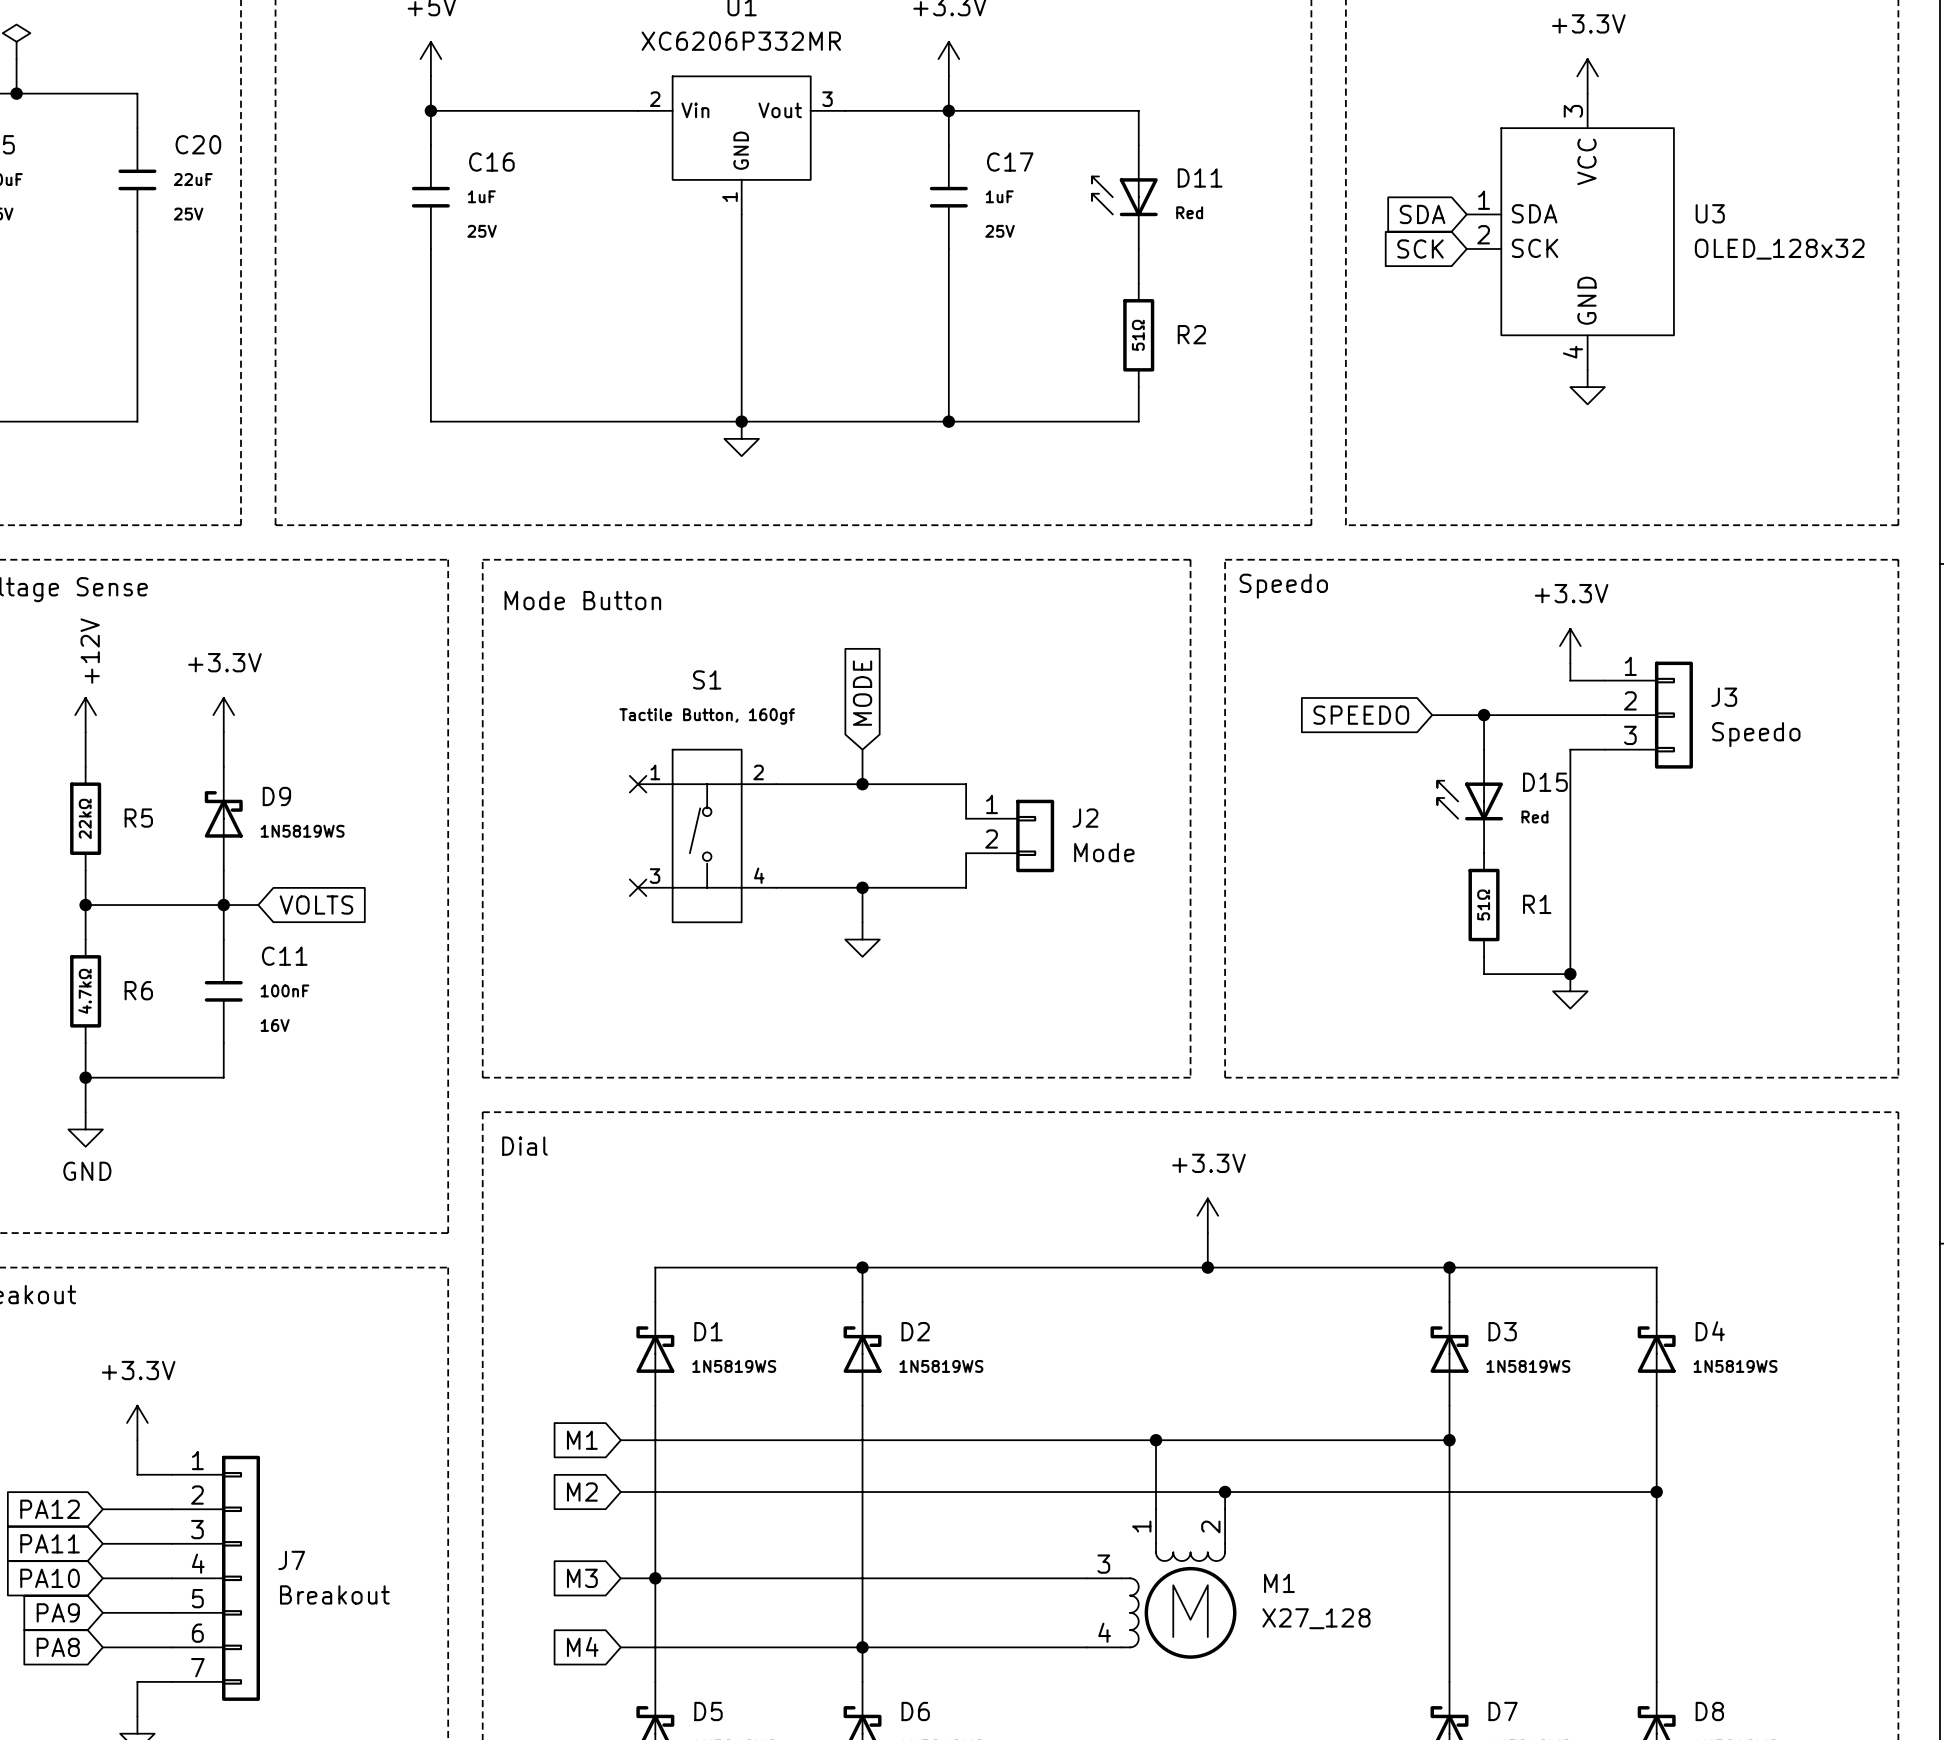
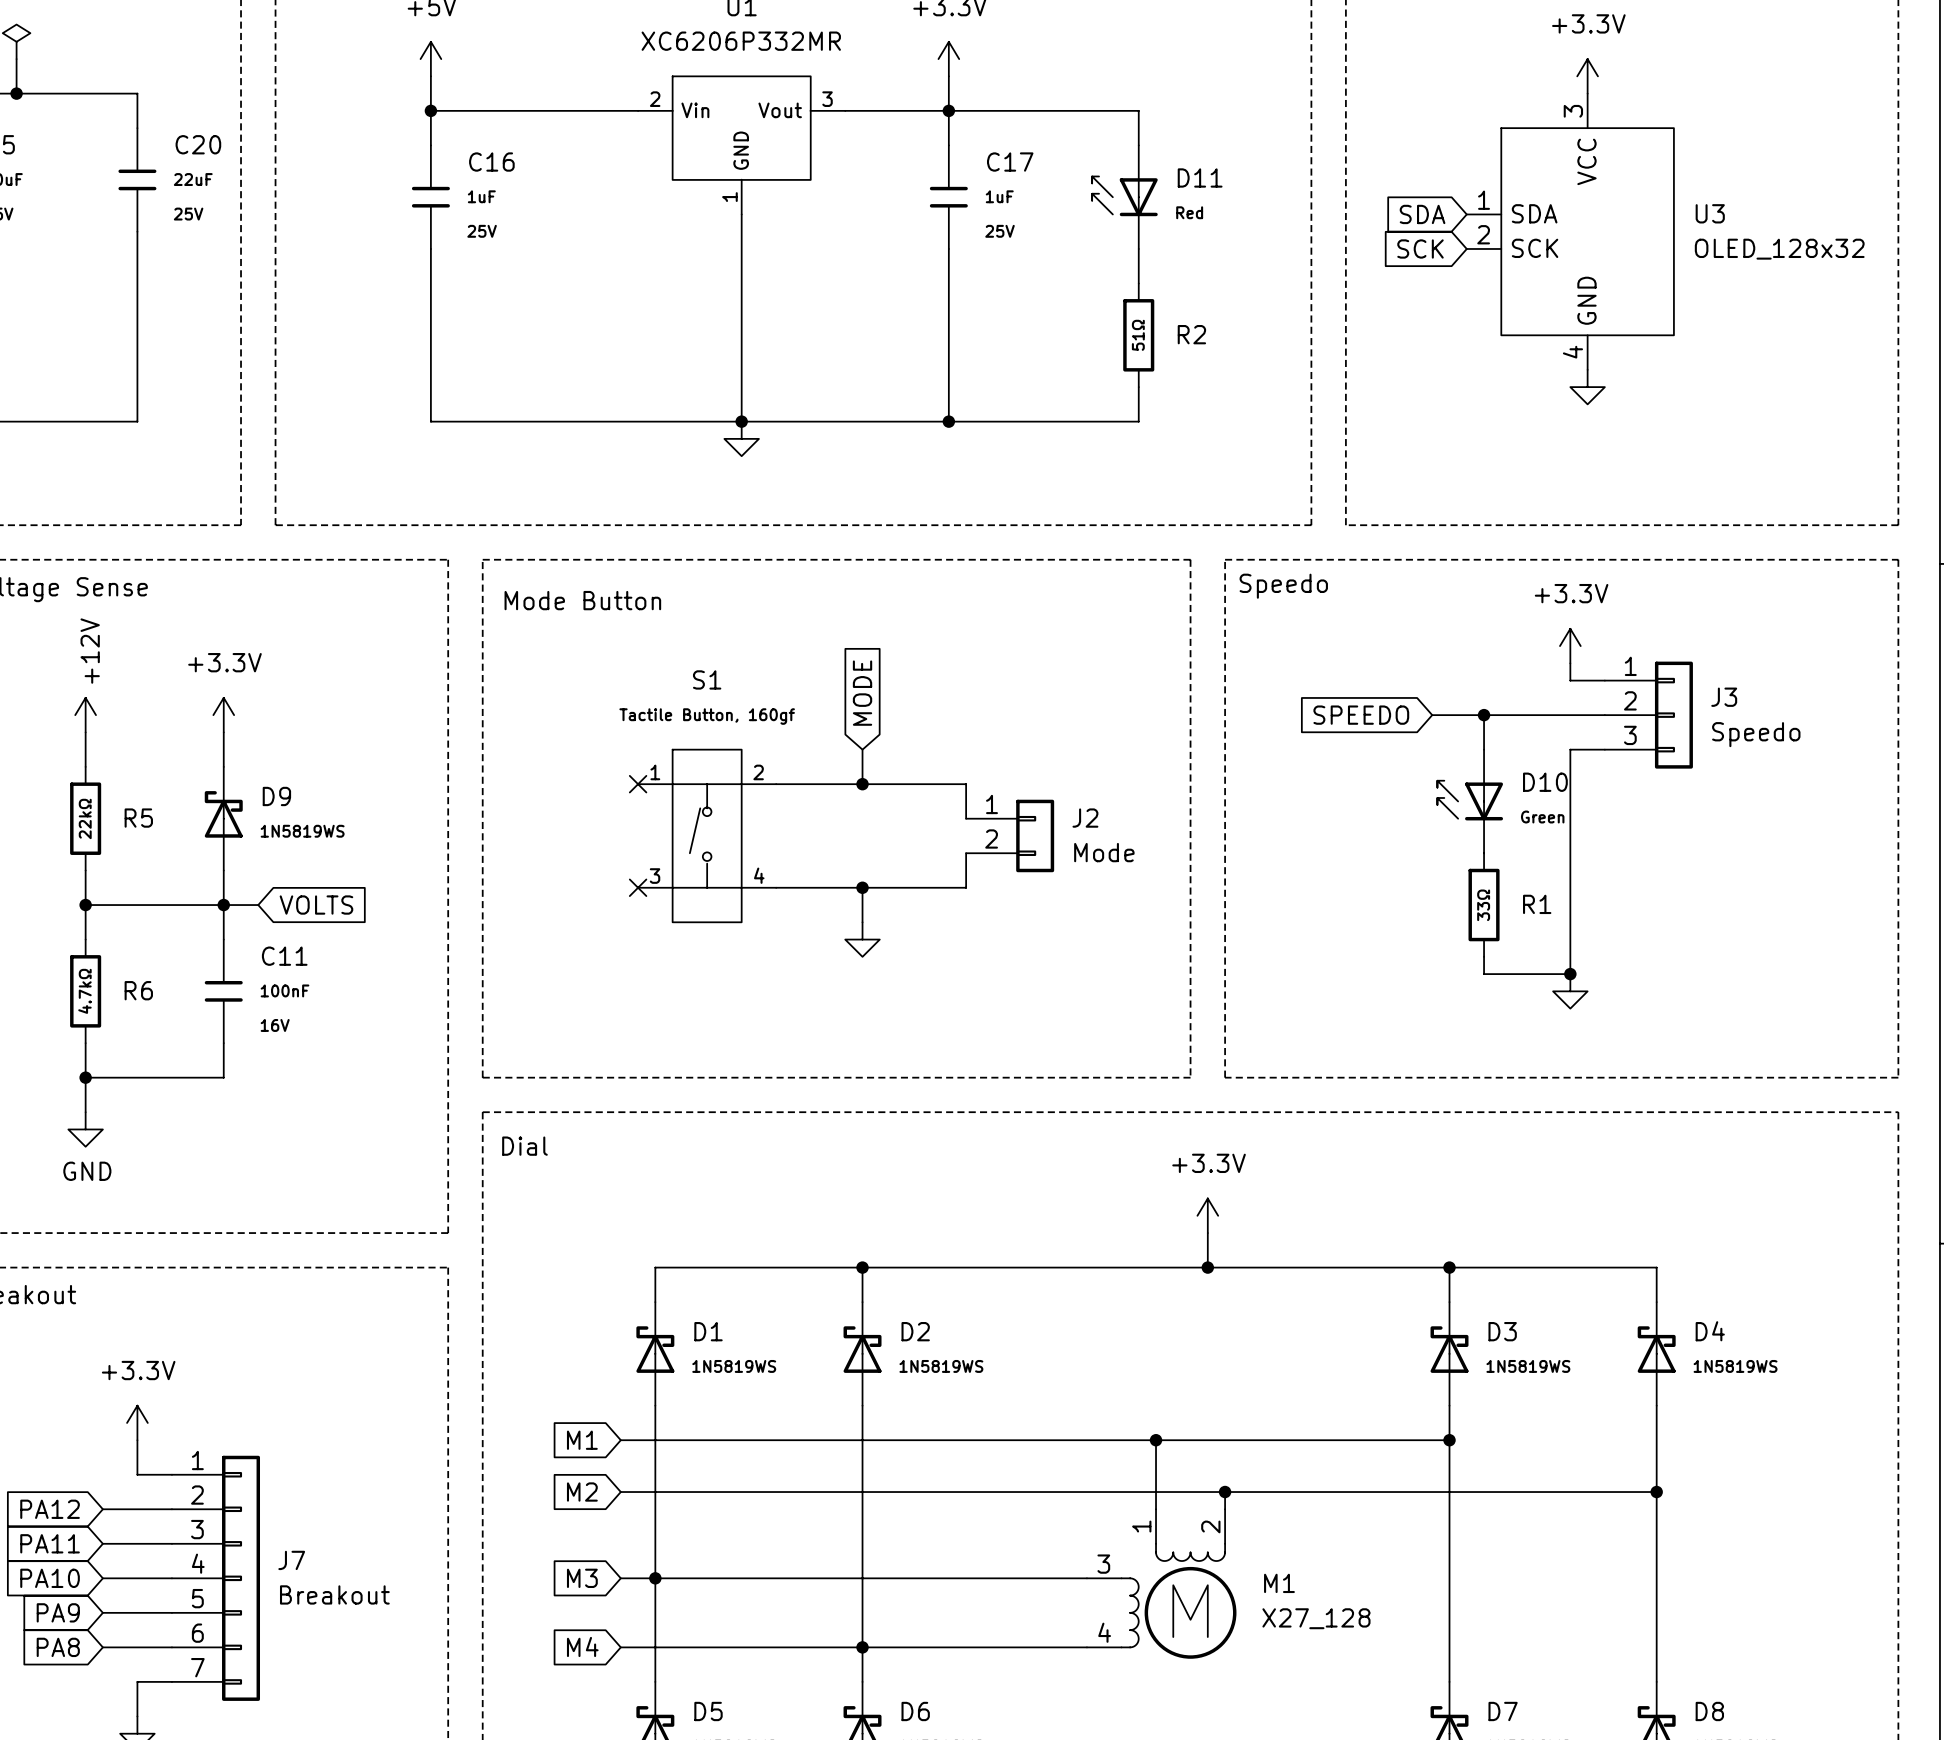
D15 name: D15 (1545, 782) -> D10 (1545, 782)
D15 value: Red (1534, 817) -> Green (1542, 817)
R1 value: 51Ω (1483, 905) -> 33Ω (1483, 905)

